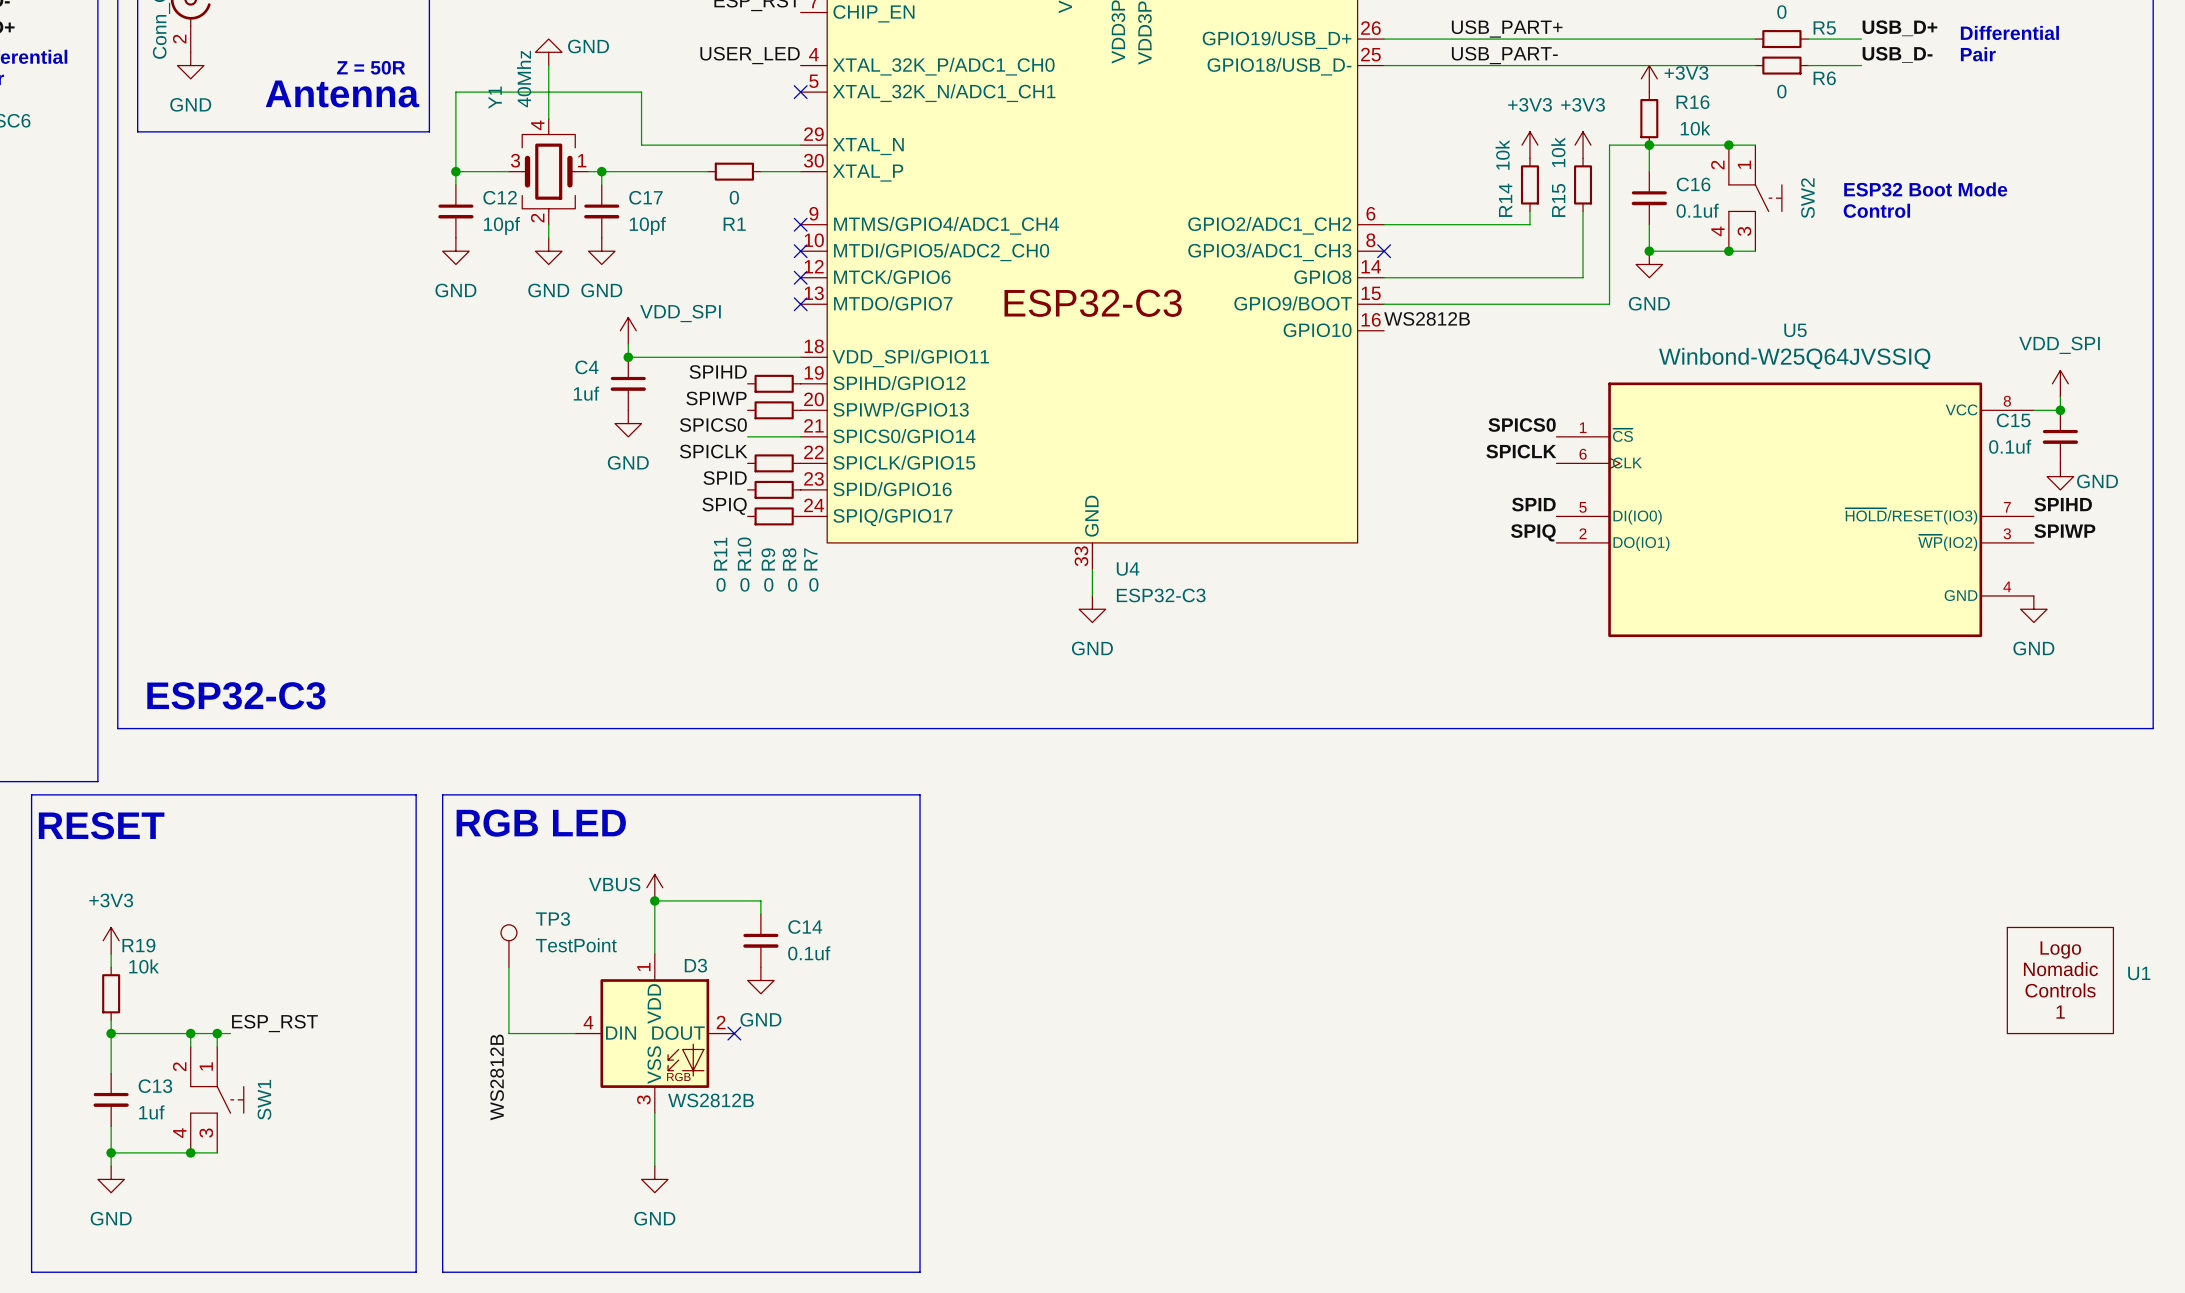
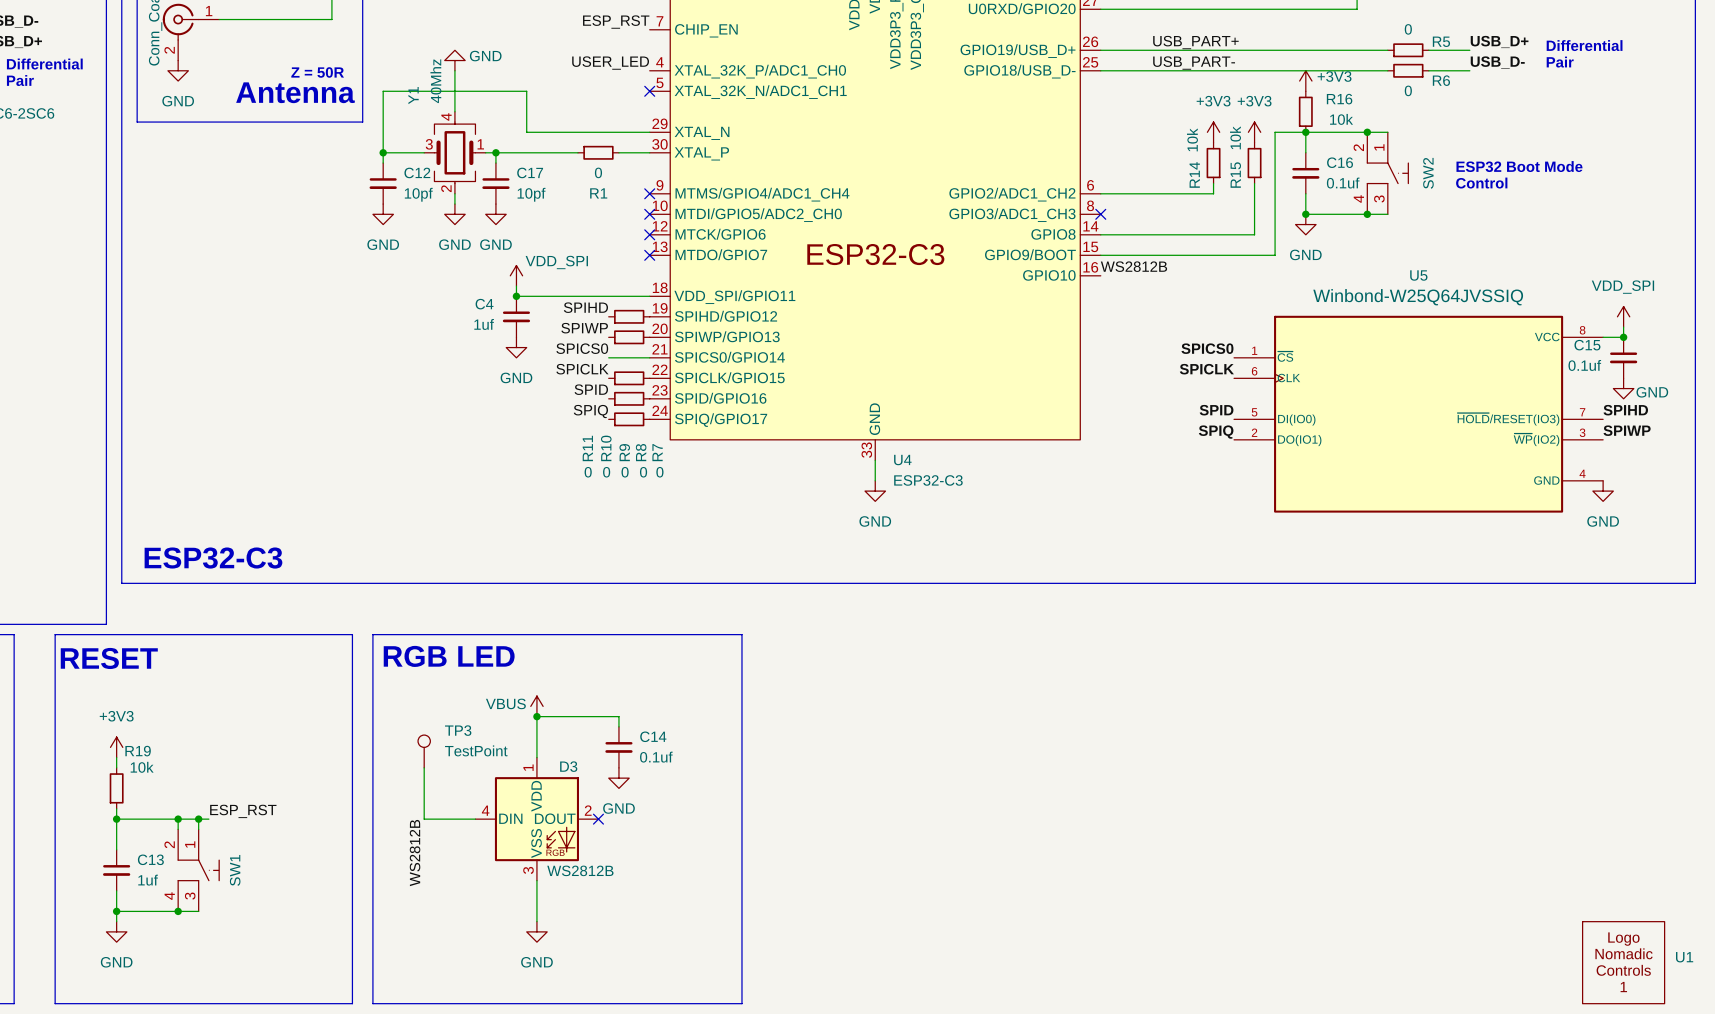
U1 position: (2060, 980) -> (1623, 962)

